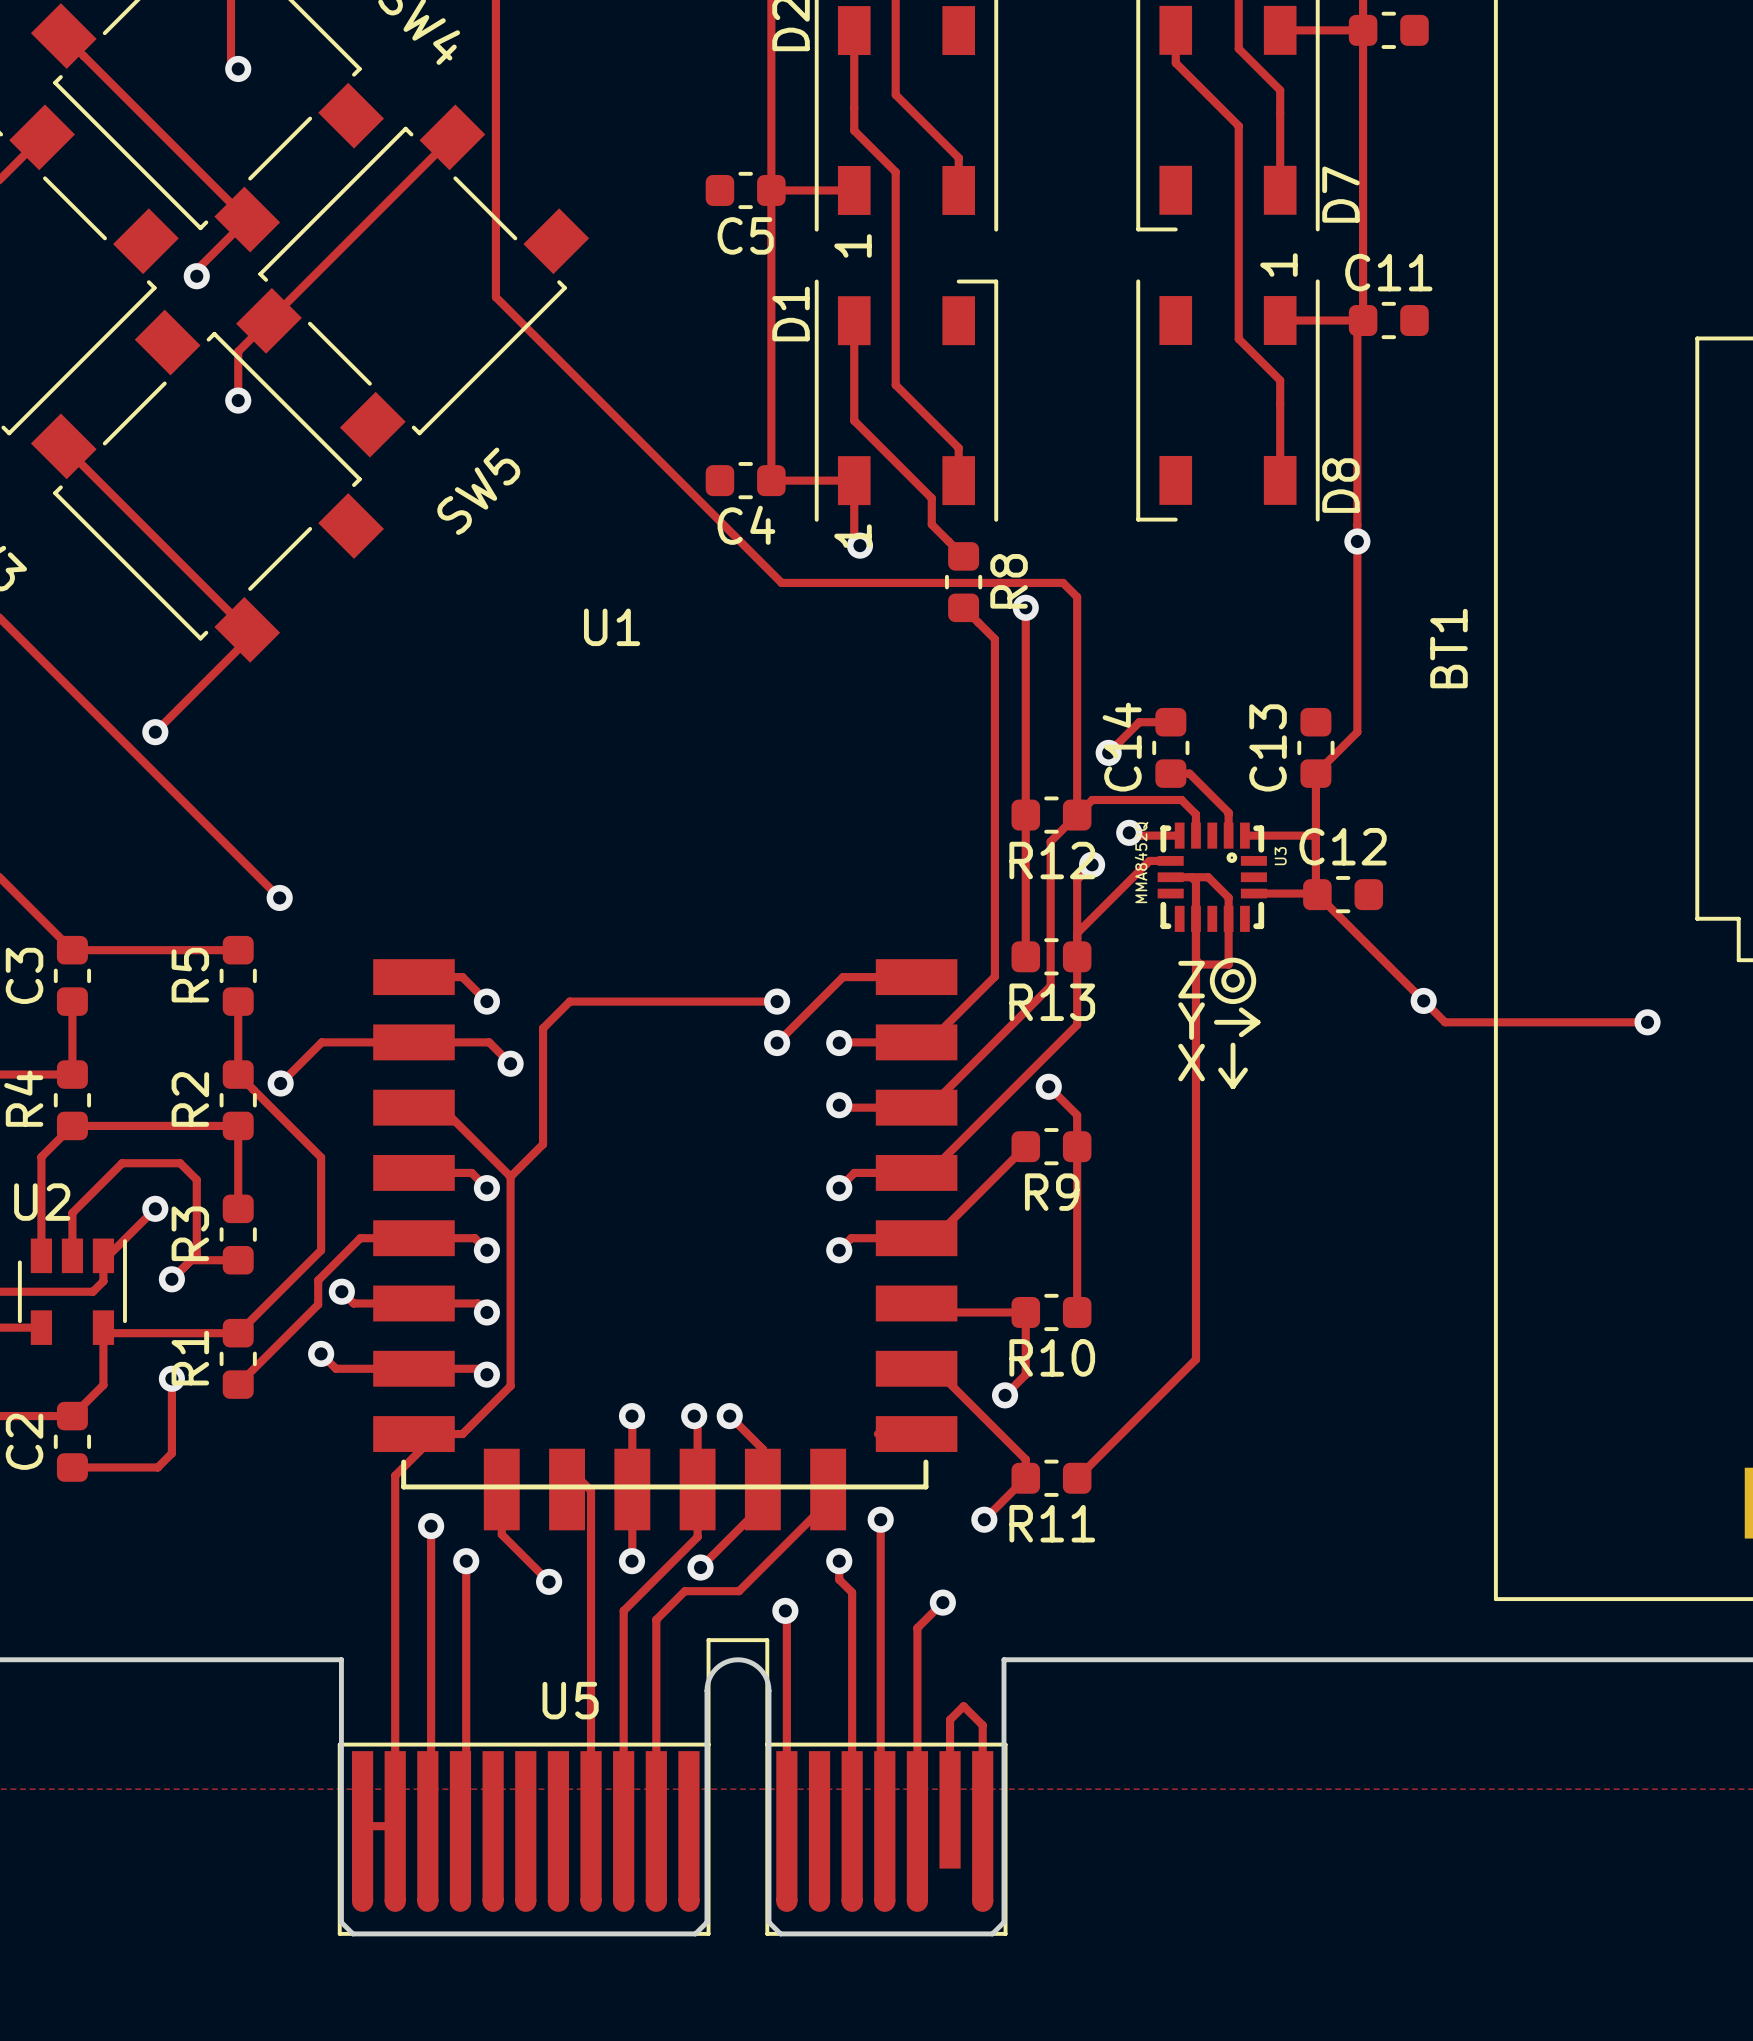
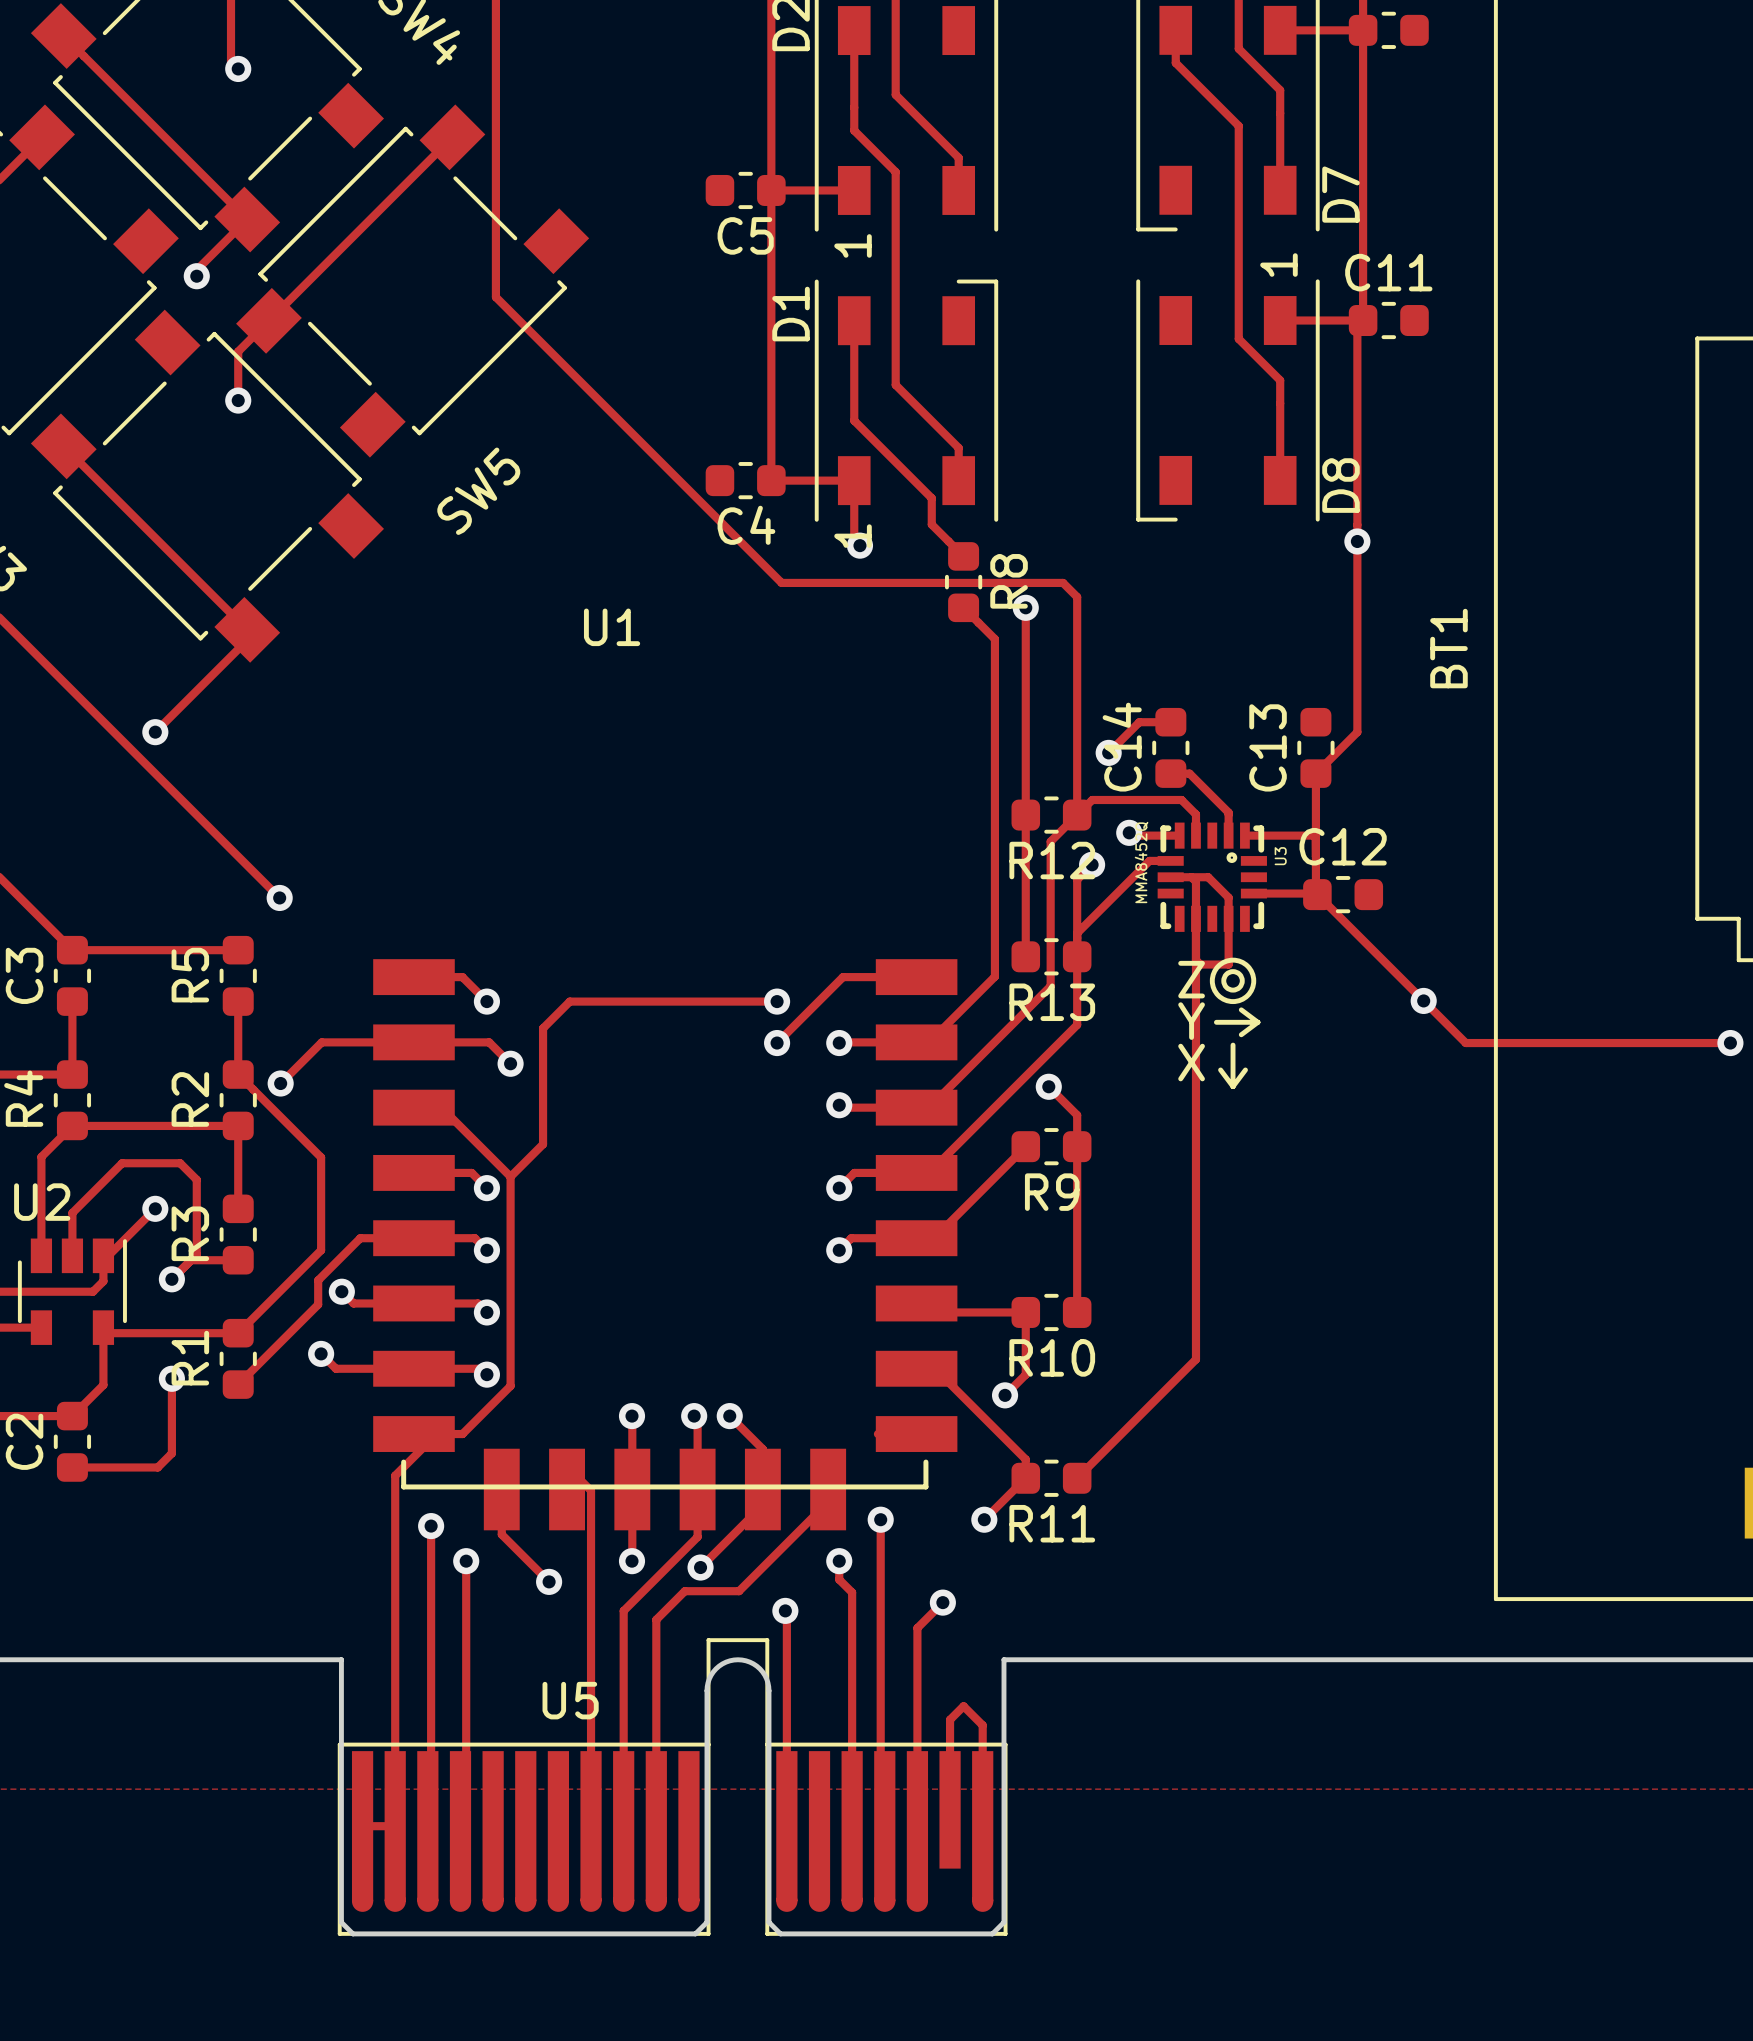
track: (1445, 1022) (1647, 1022) -> (1445, 1022) (1465, 1043) (1730, 1043)
via position: (1647, 1022) -> (1730, 1043)

